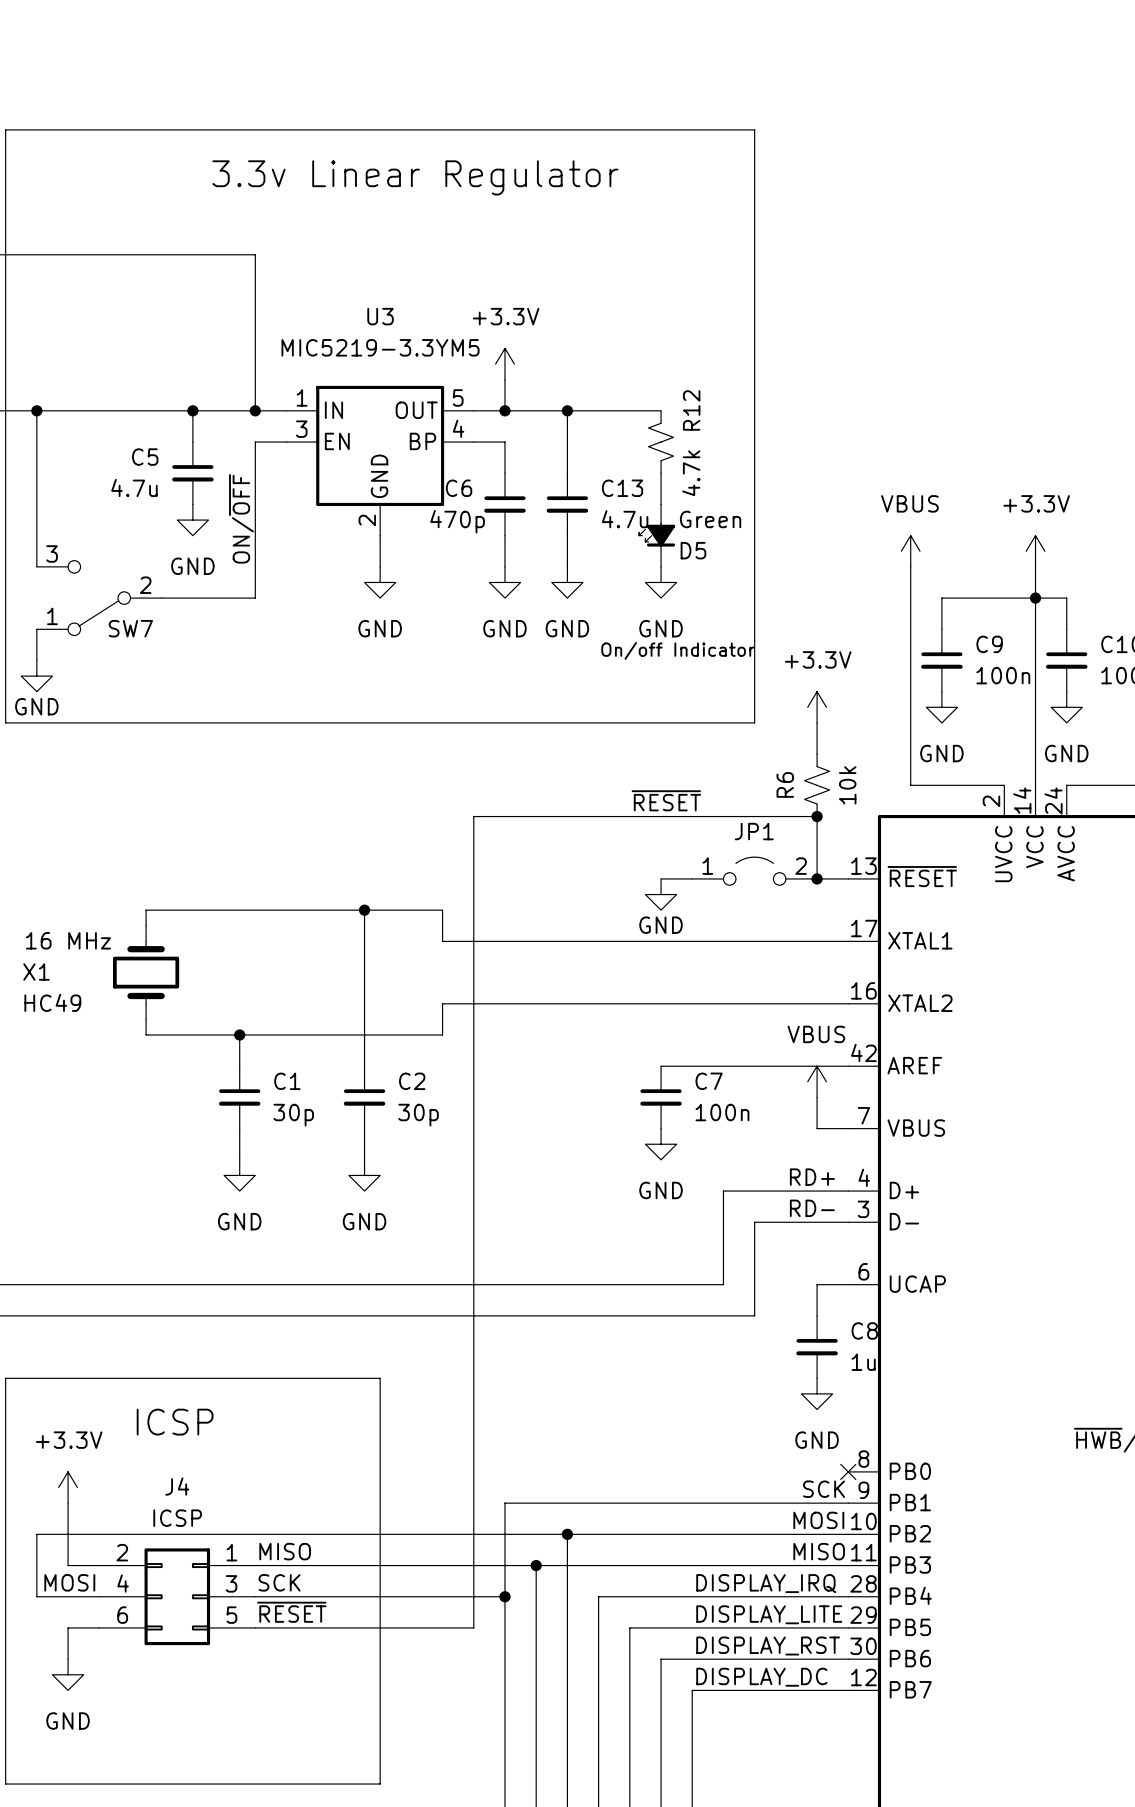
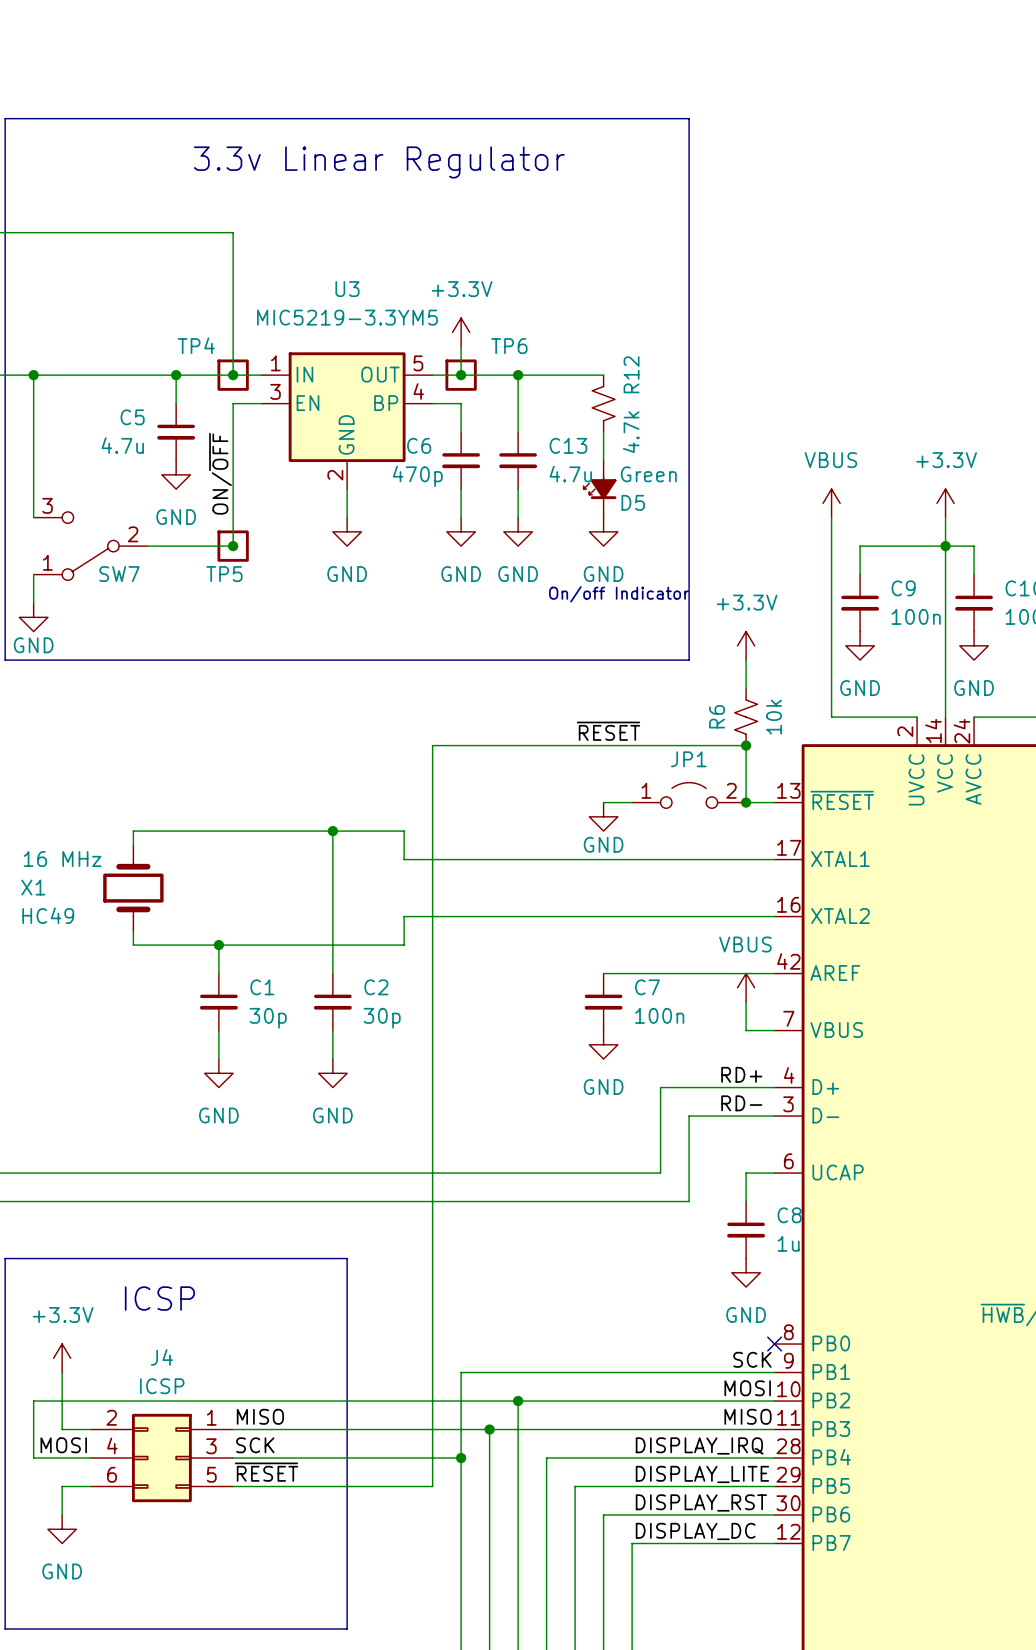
TP4: none -> (233, 375)
TP6: none -> (461, 375)
junction: none -> (233, 546)
TP5: none -> (233, 546)

